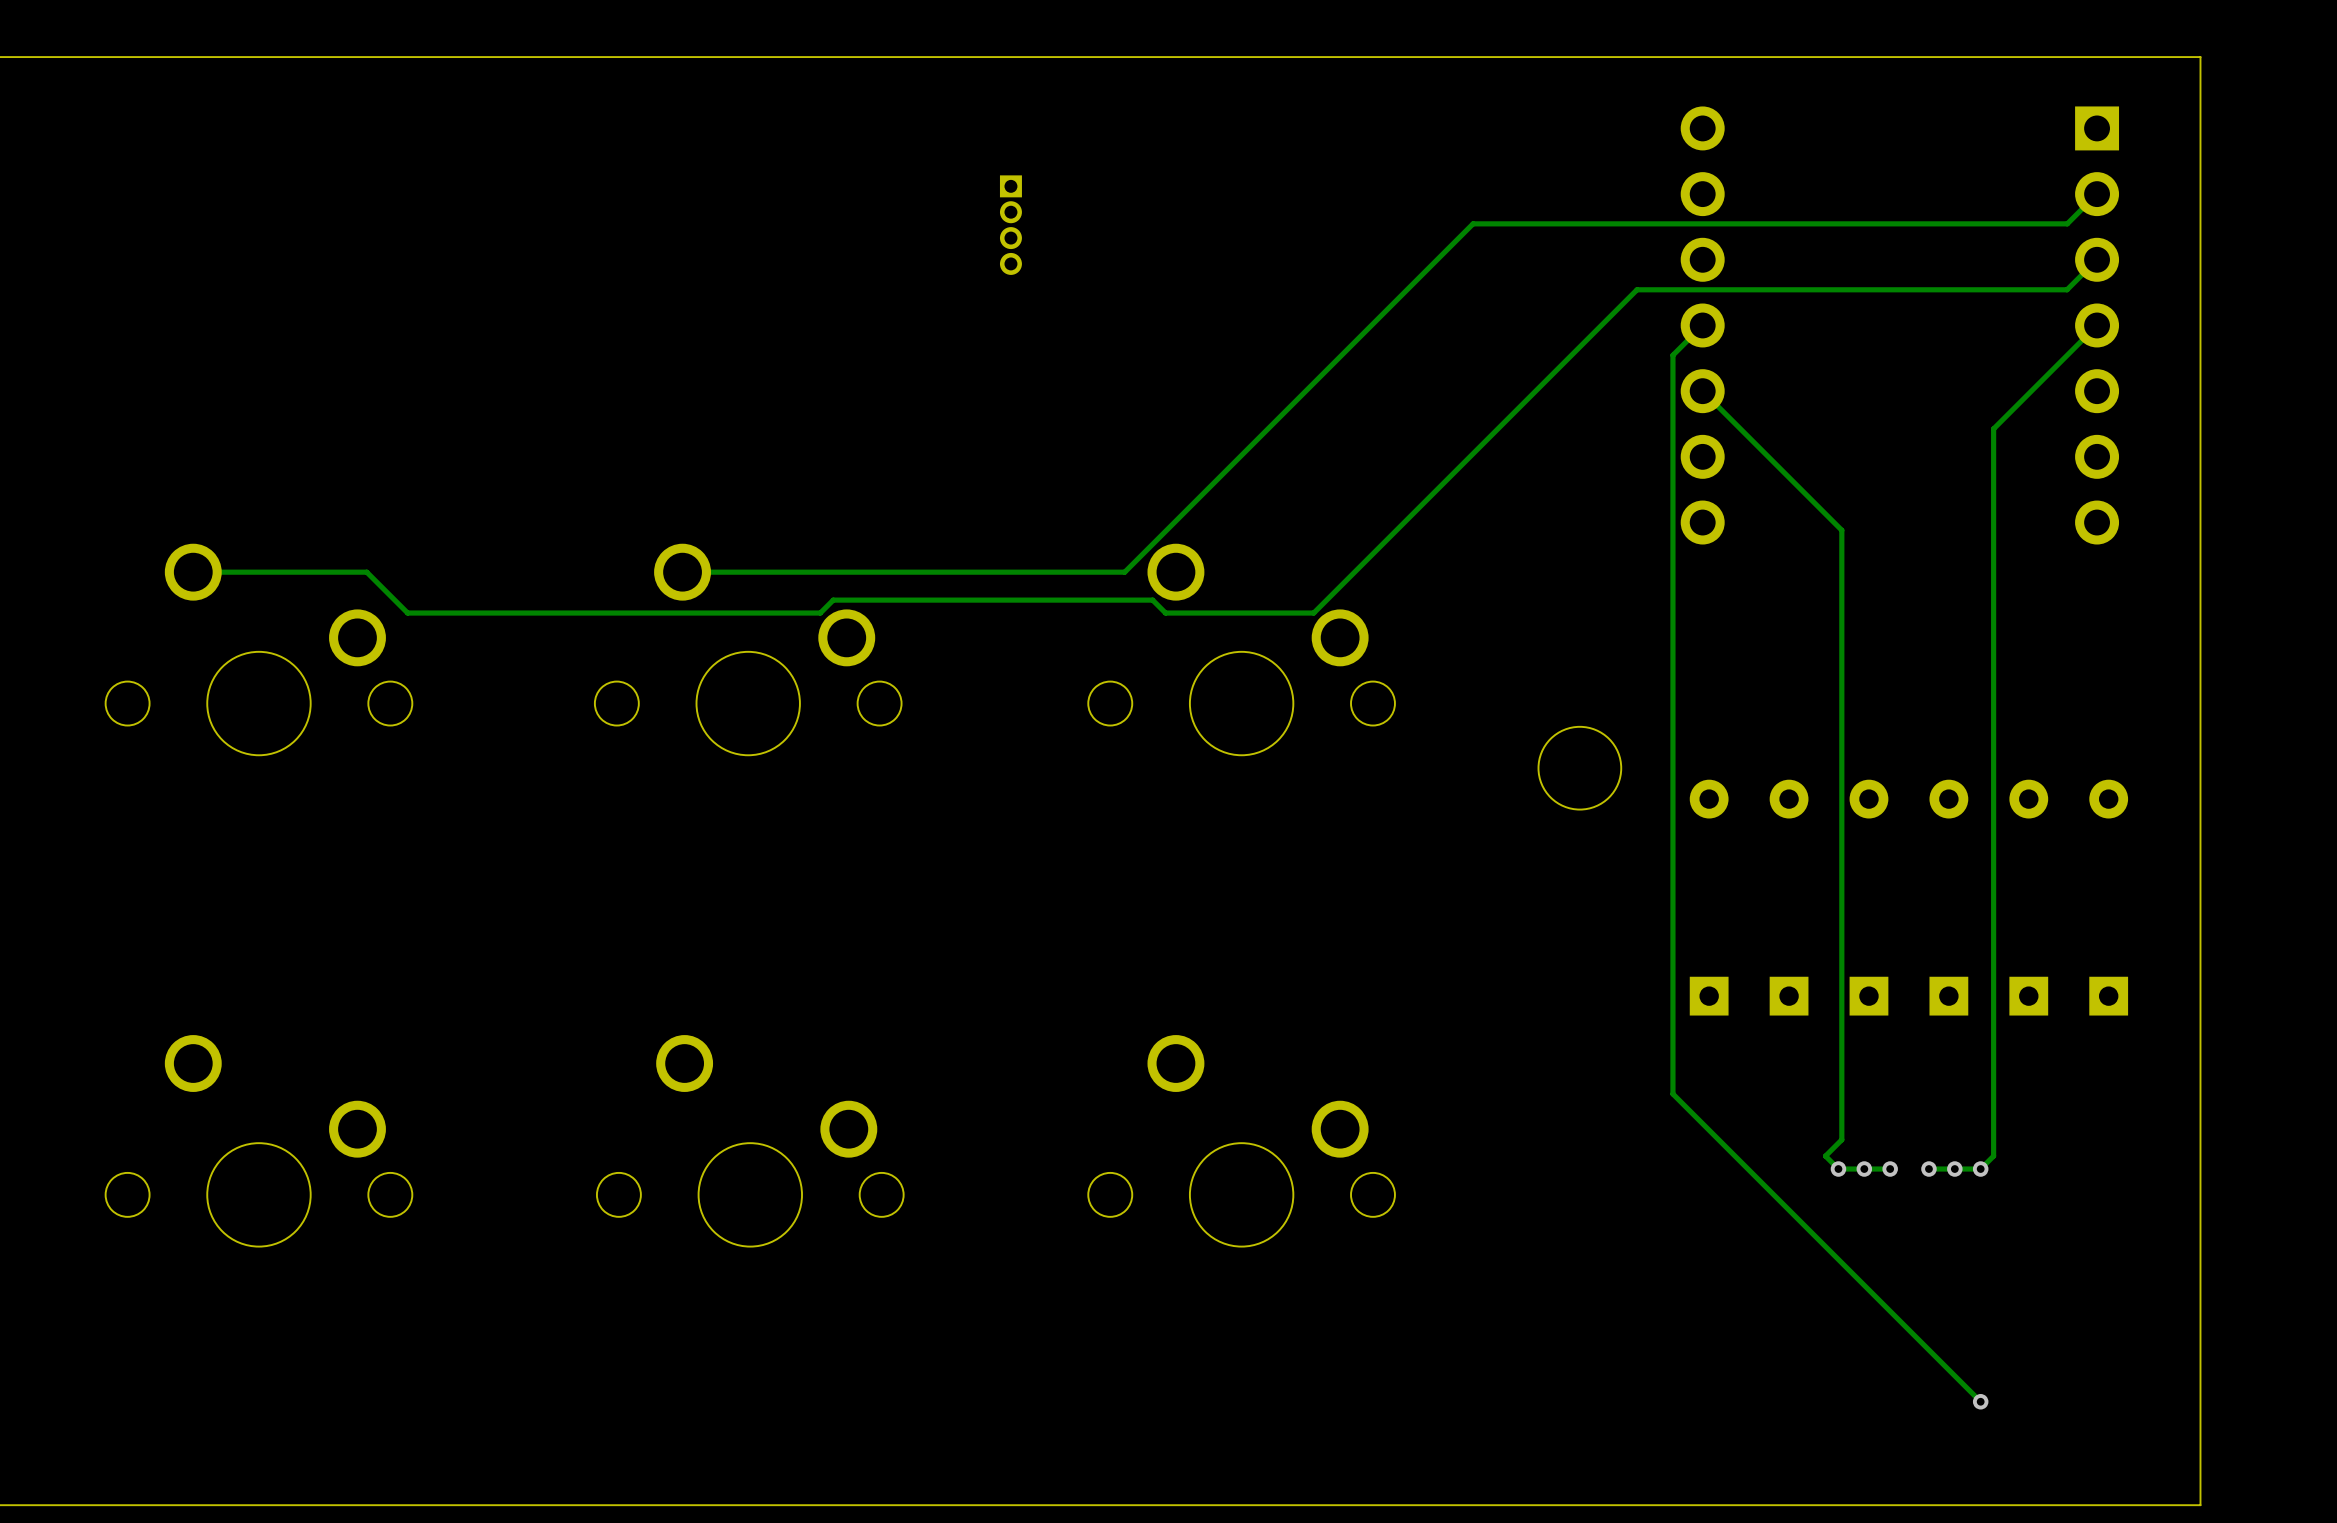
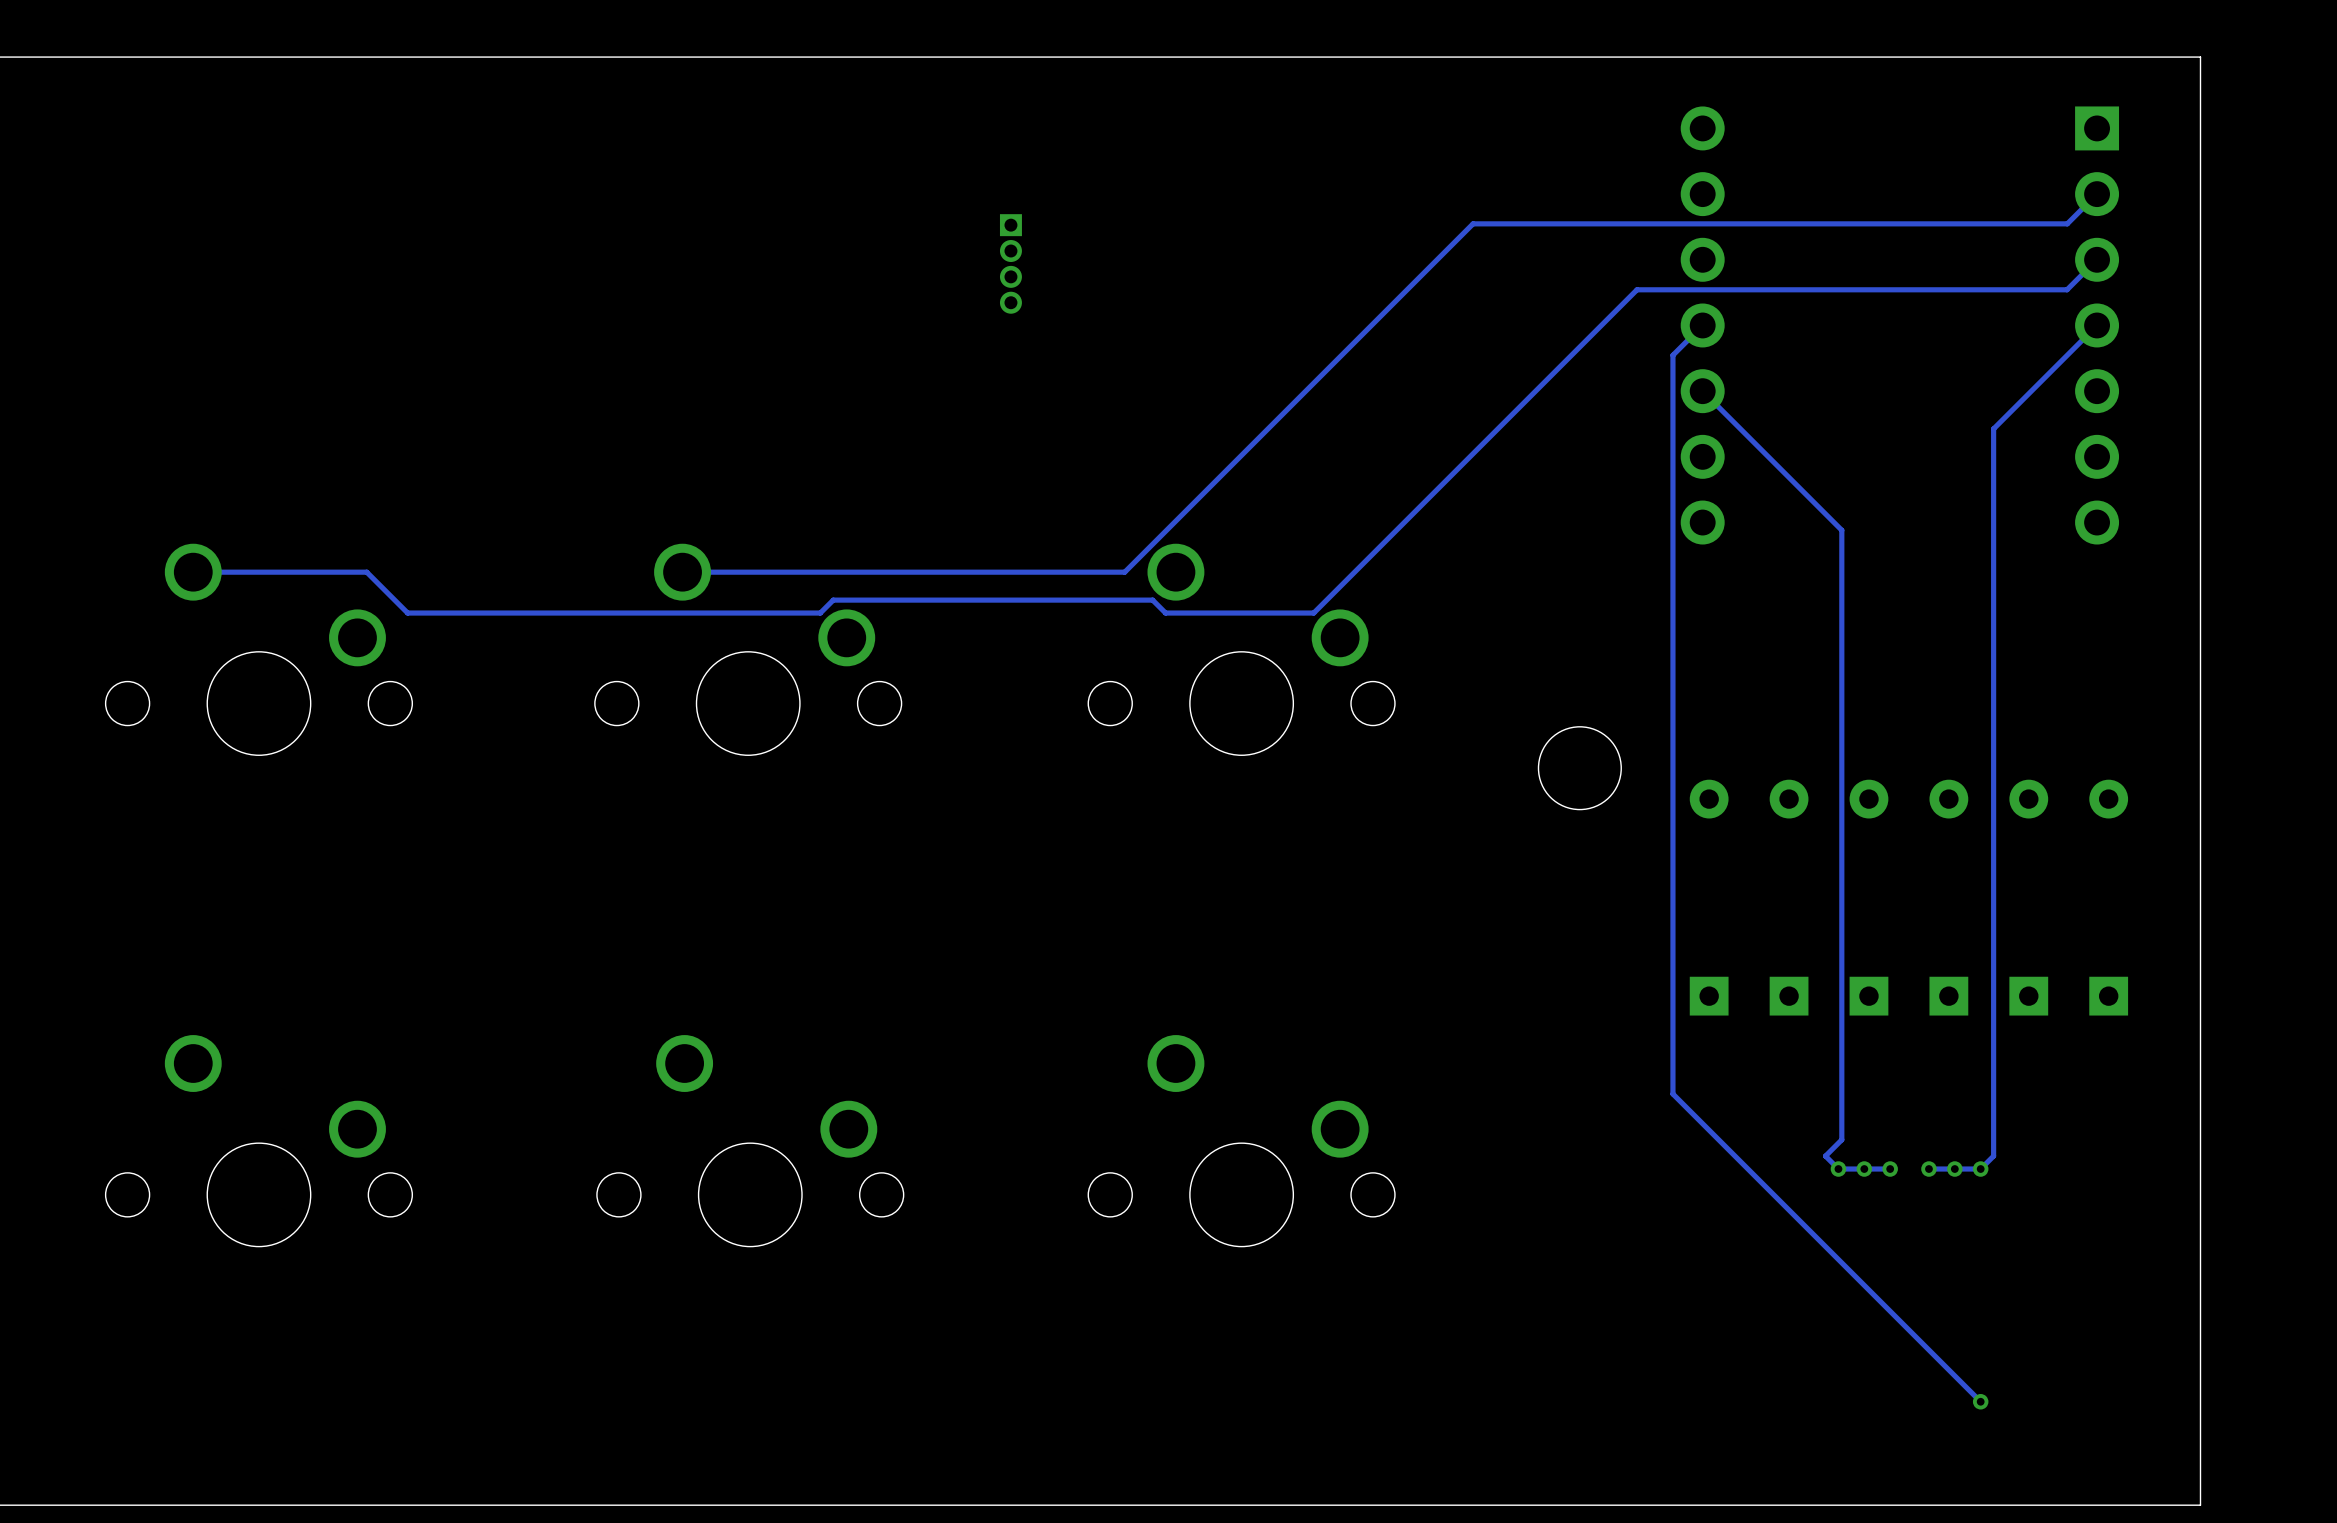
part position: (1010, 225) -> (1010, 263)

